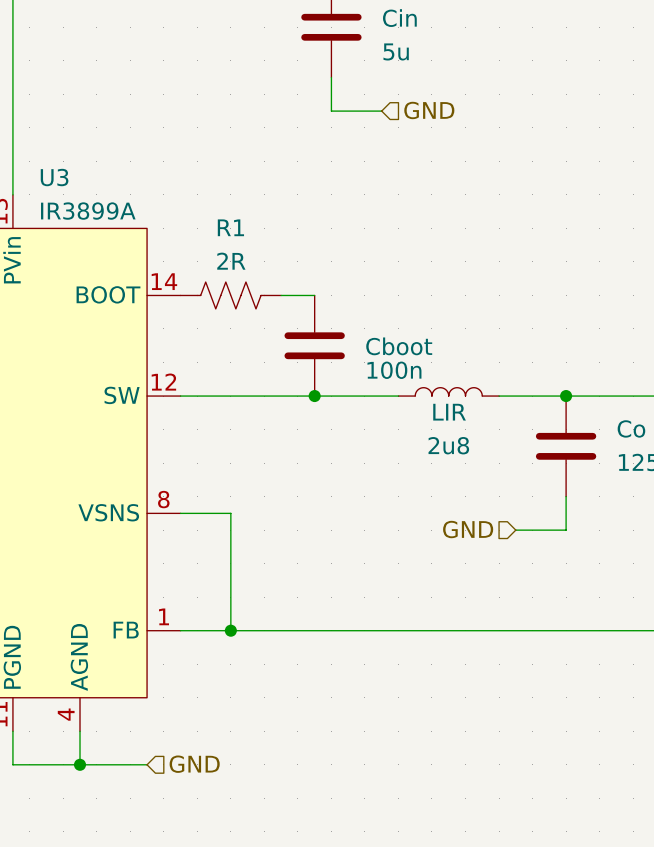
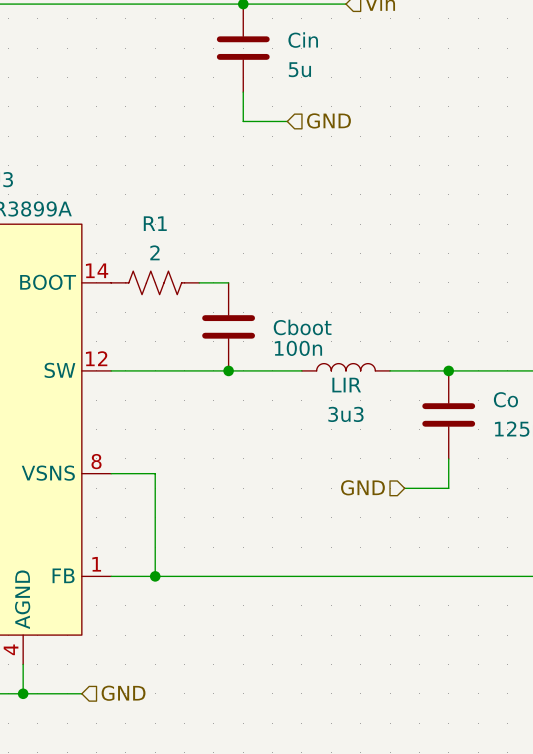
R1 value: 2R (231, 261) -> 2 (154, 252)
LIR value: 2u8 (448, 445) -> 3u3 (345, 414)

